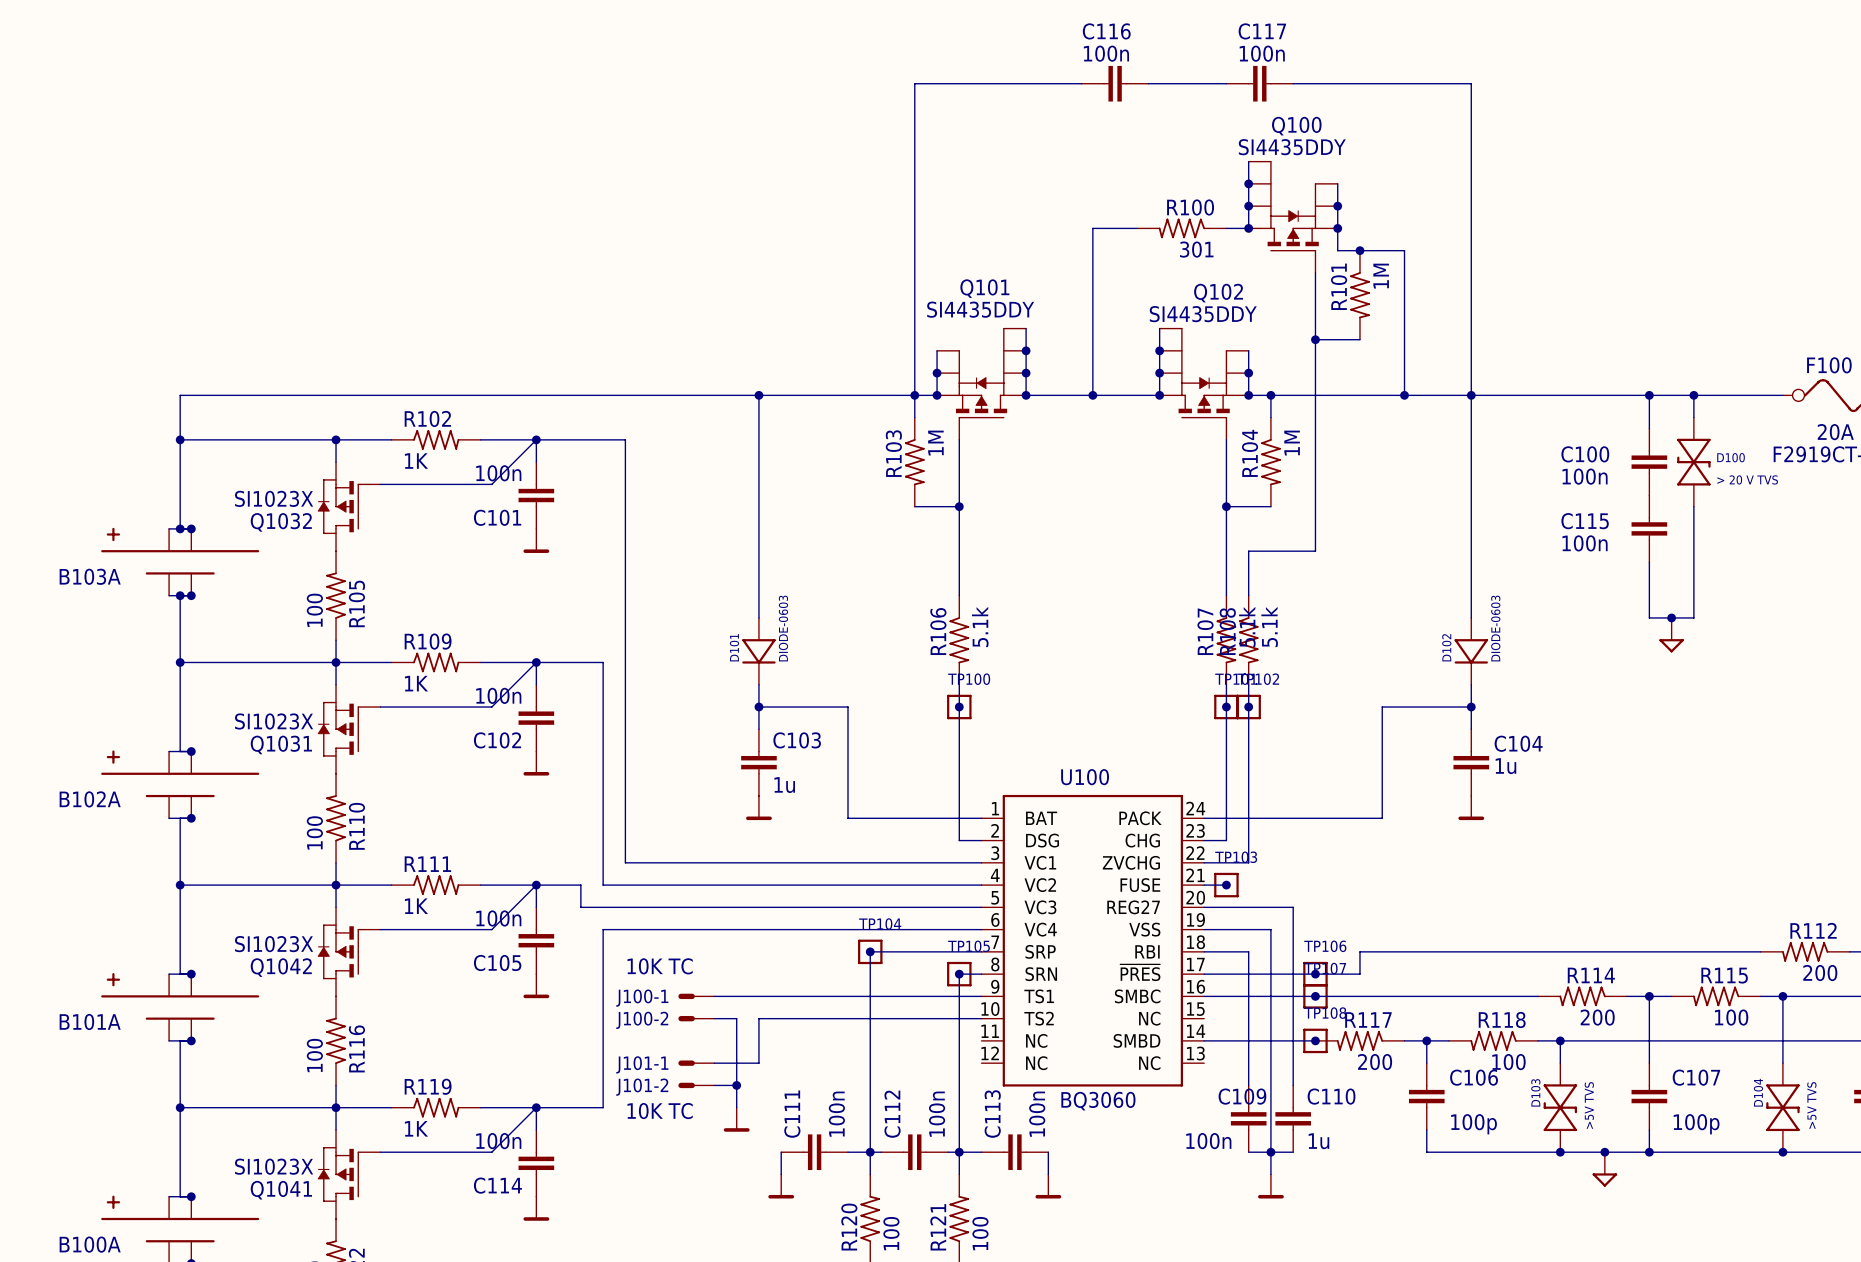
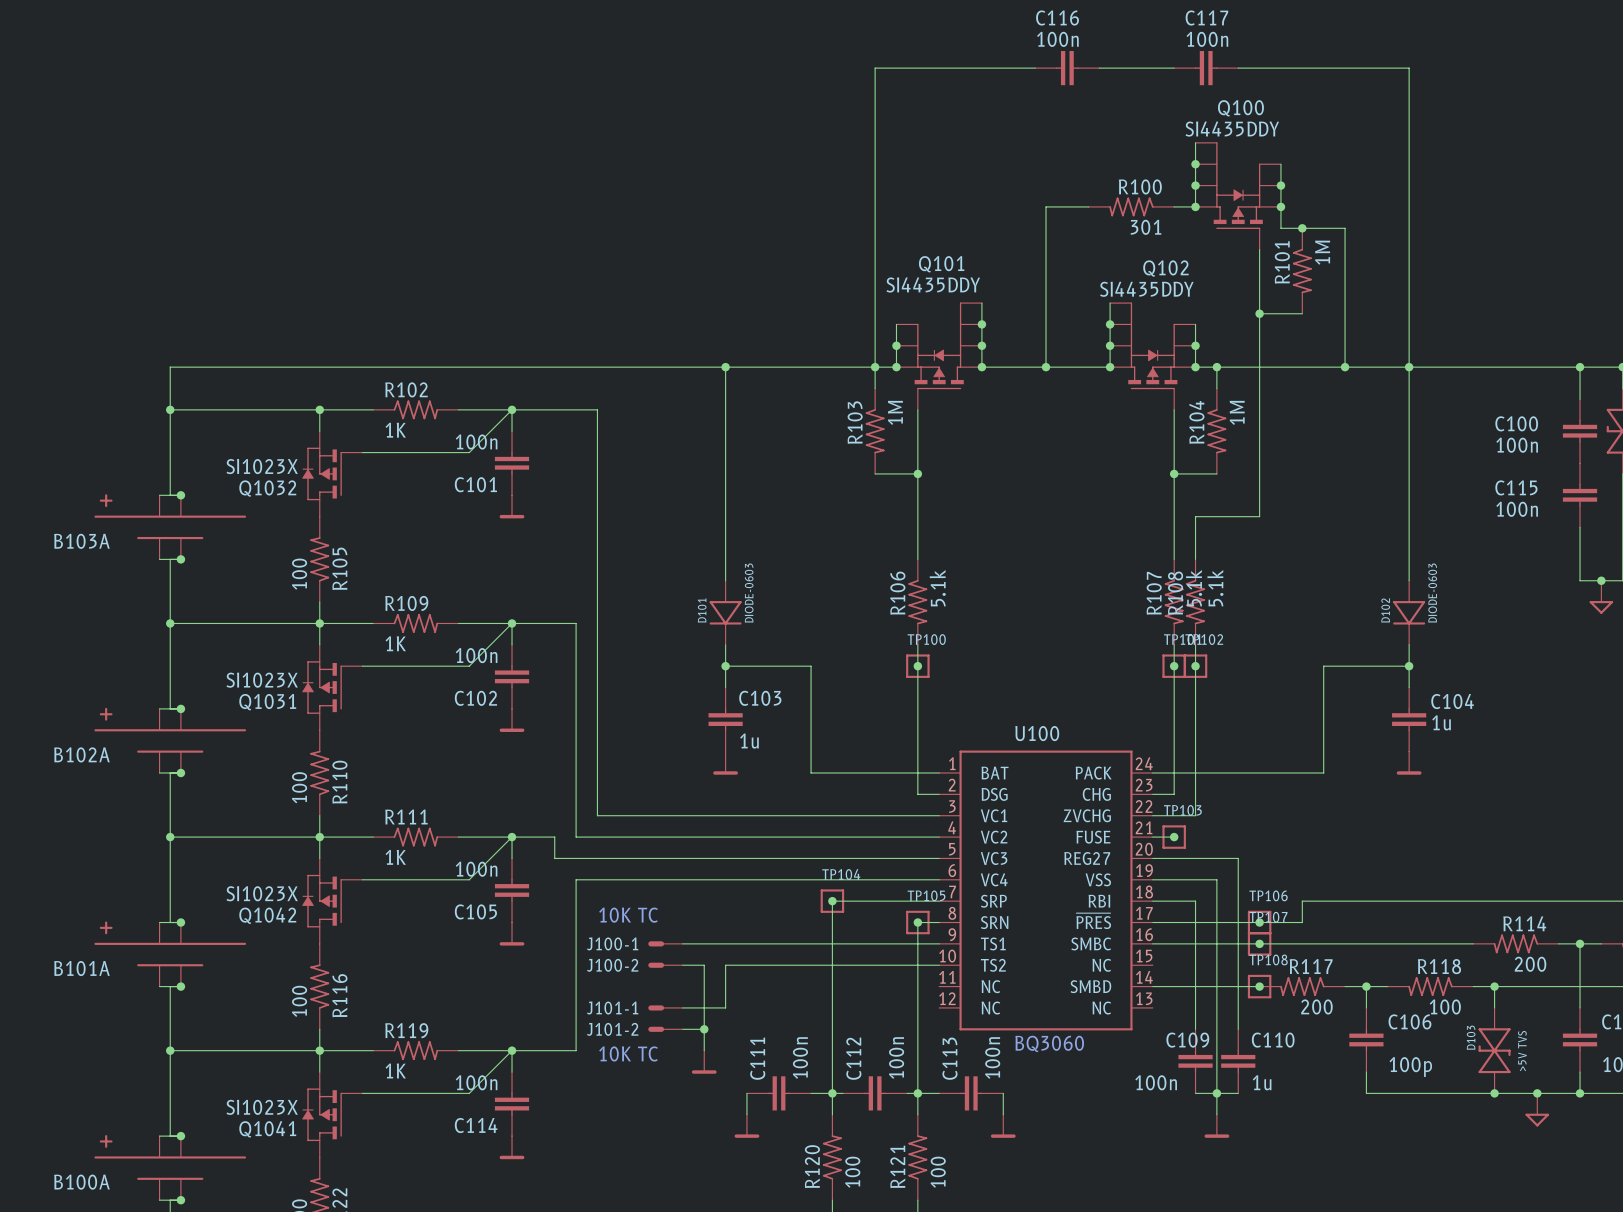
junction: (180, 528) -> none
junction: (180, 595) -> none

